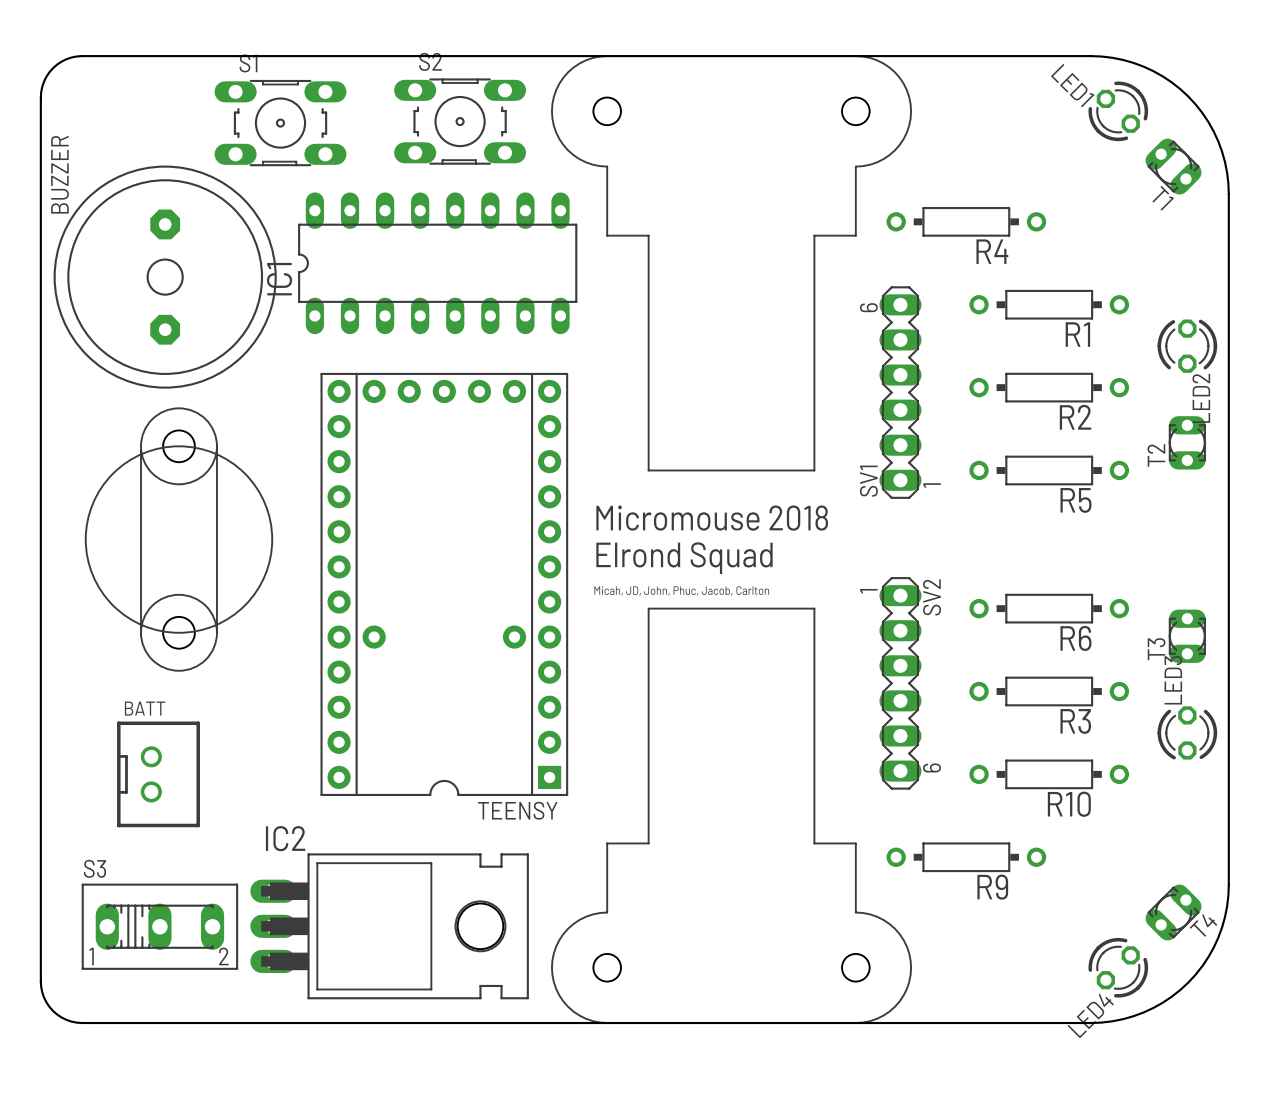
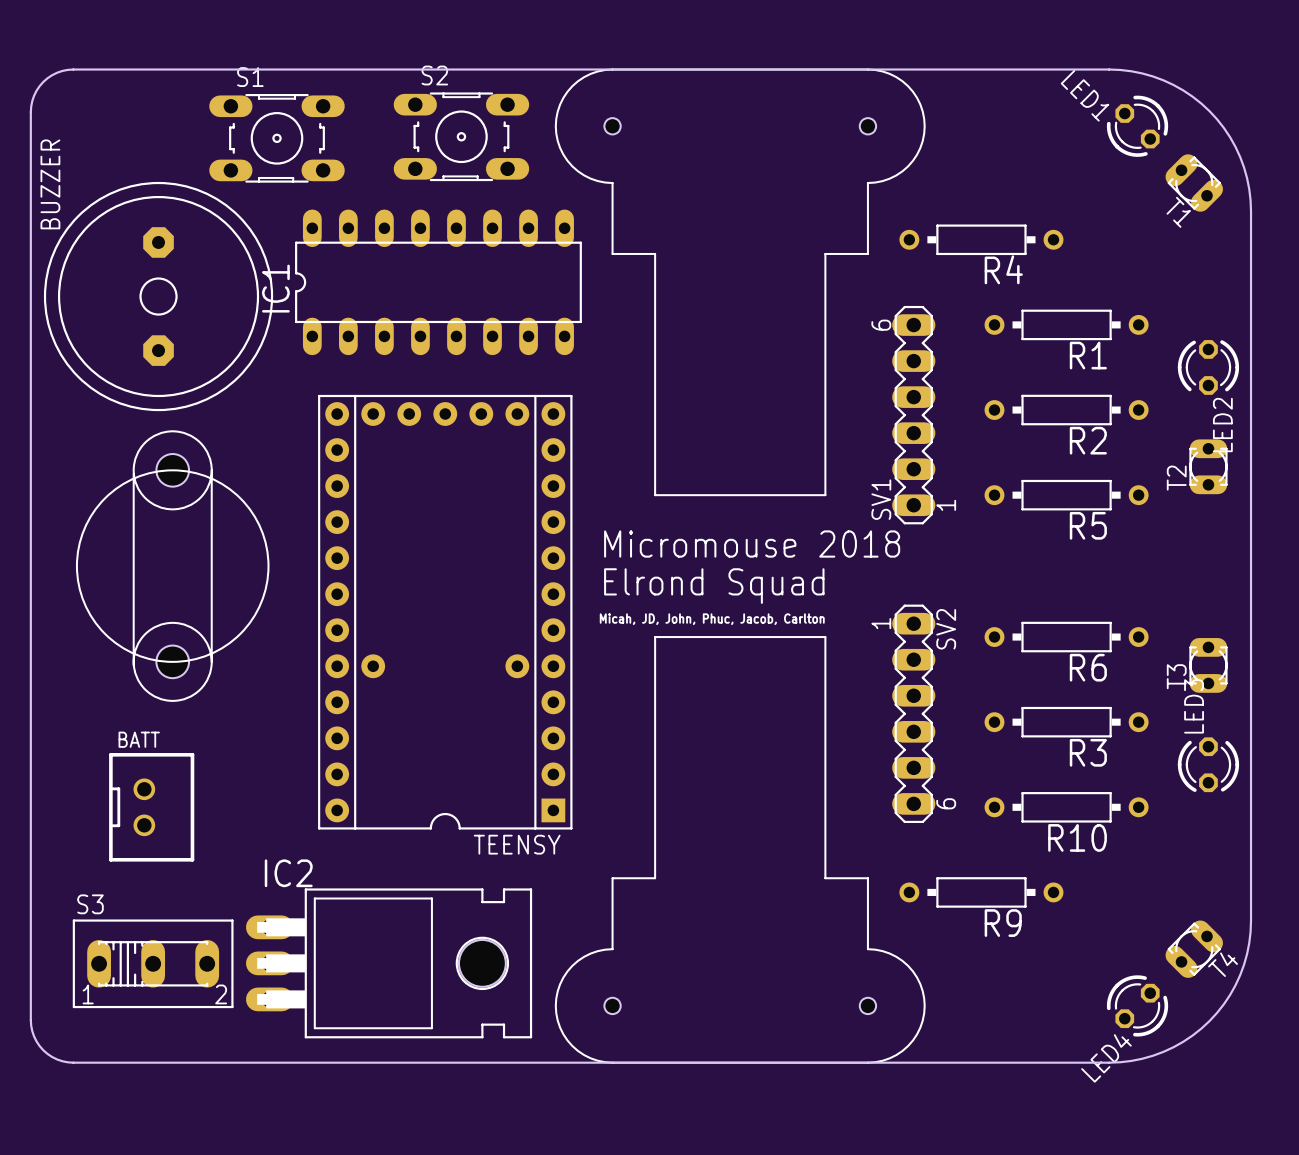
part footprint: [551, 55, 912, 472] -> [554, 68, 926, 497]
part footprint: [551, 607, 912, 1024] -> [554, 636, 926, 1064]

